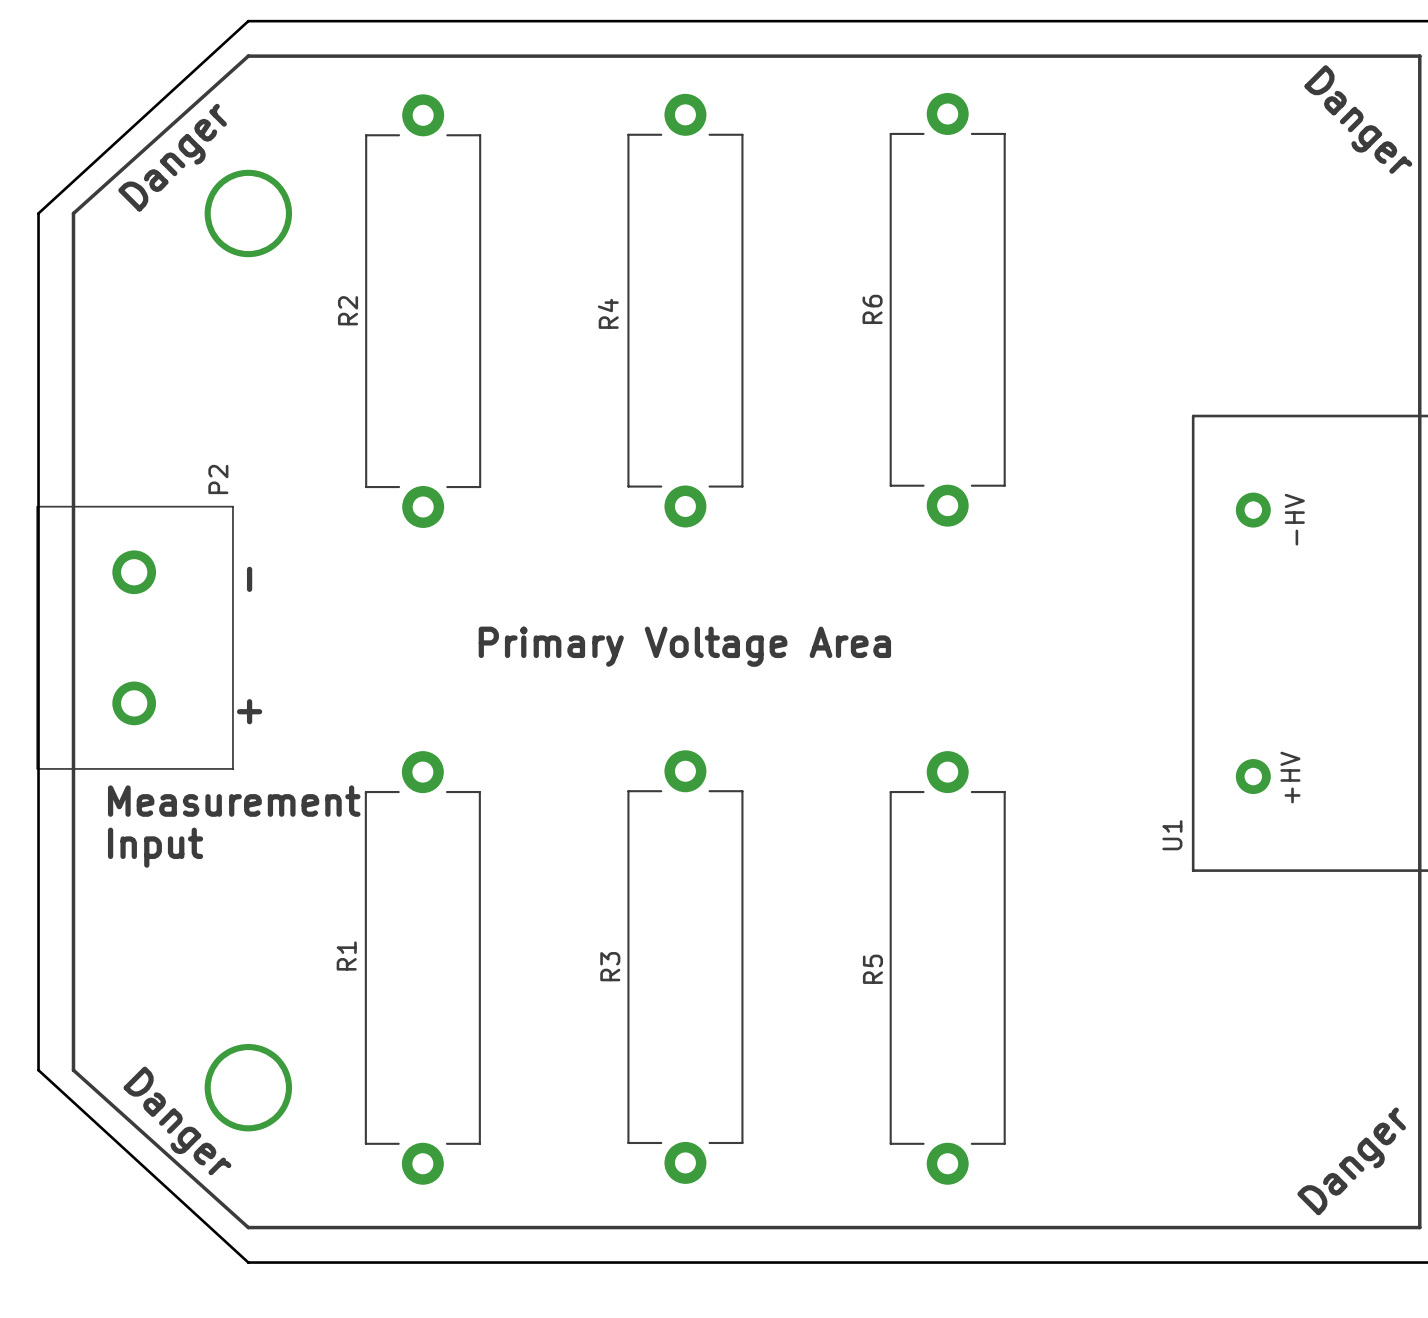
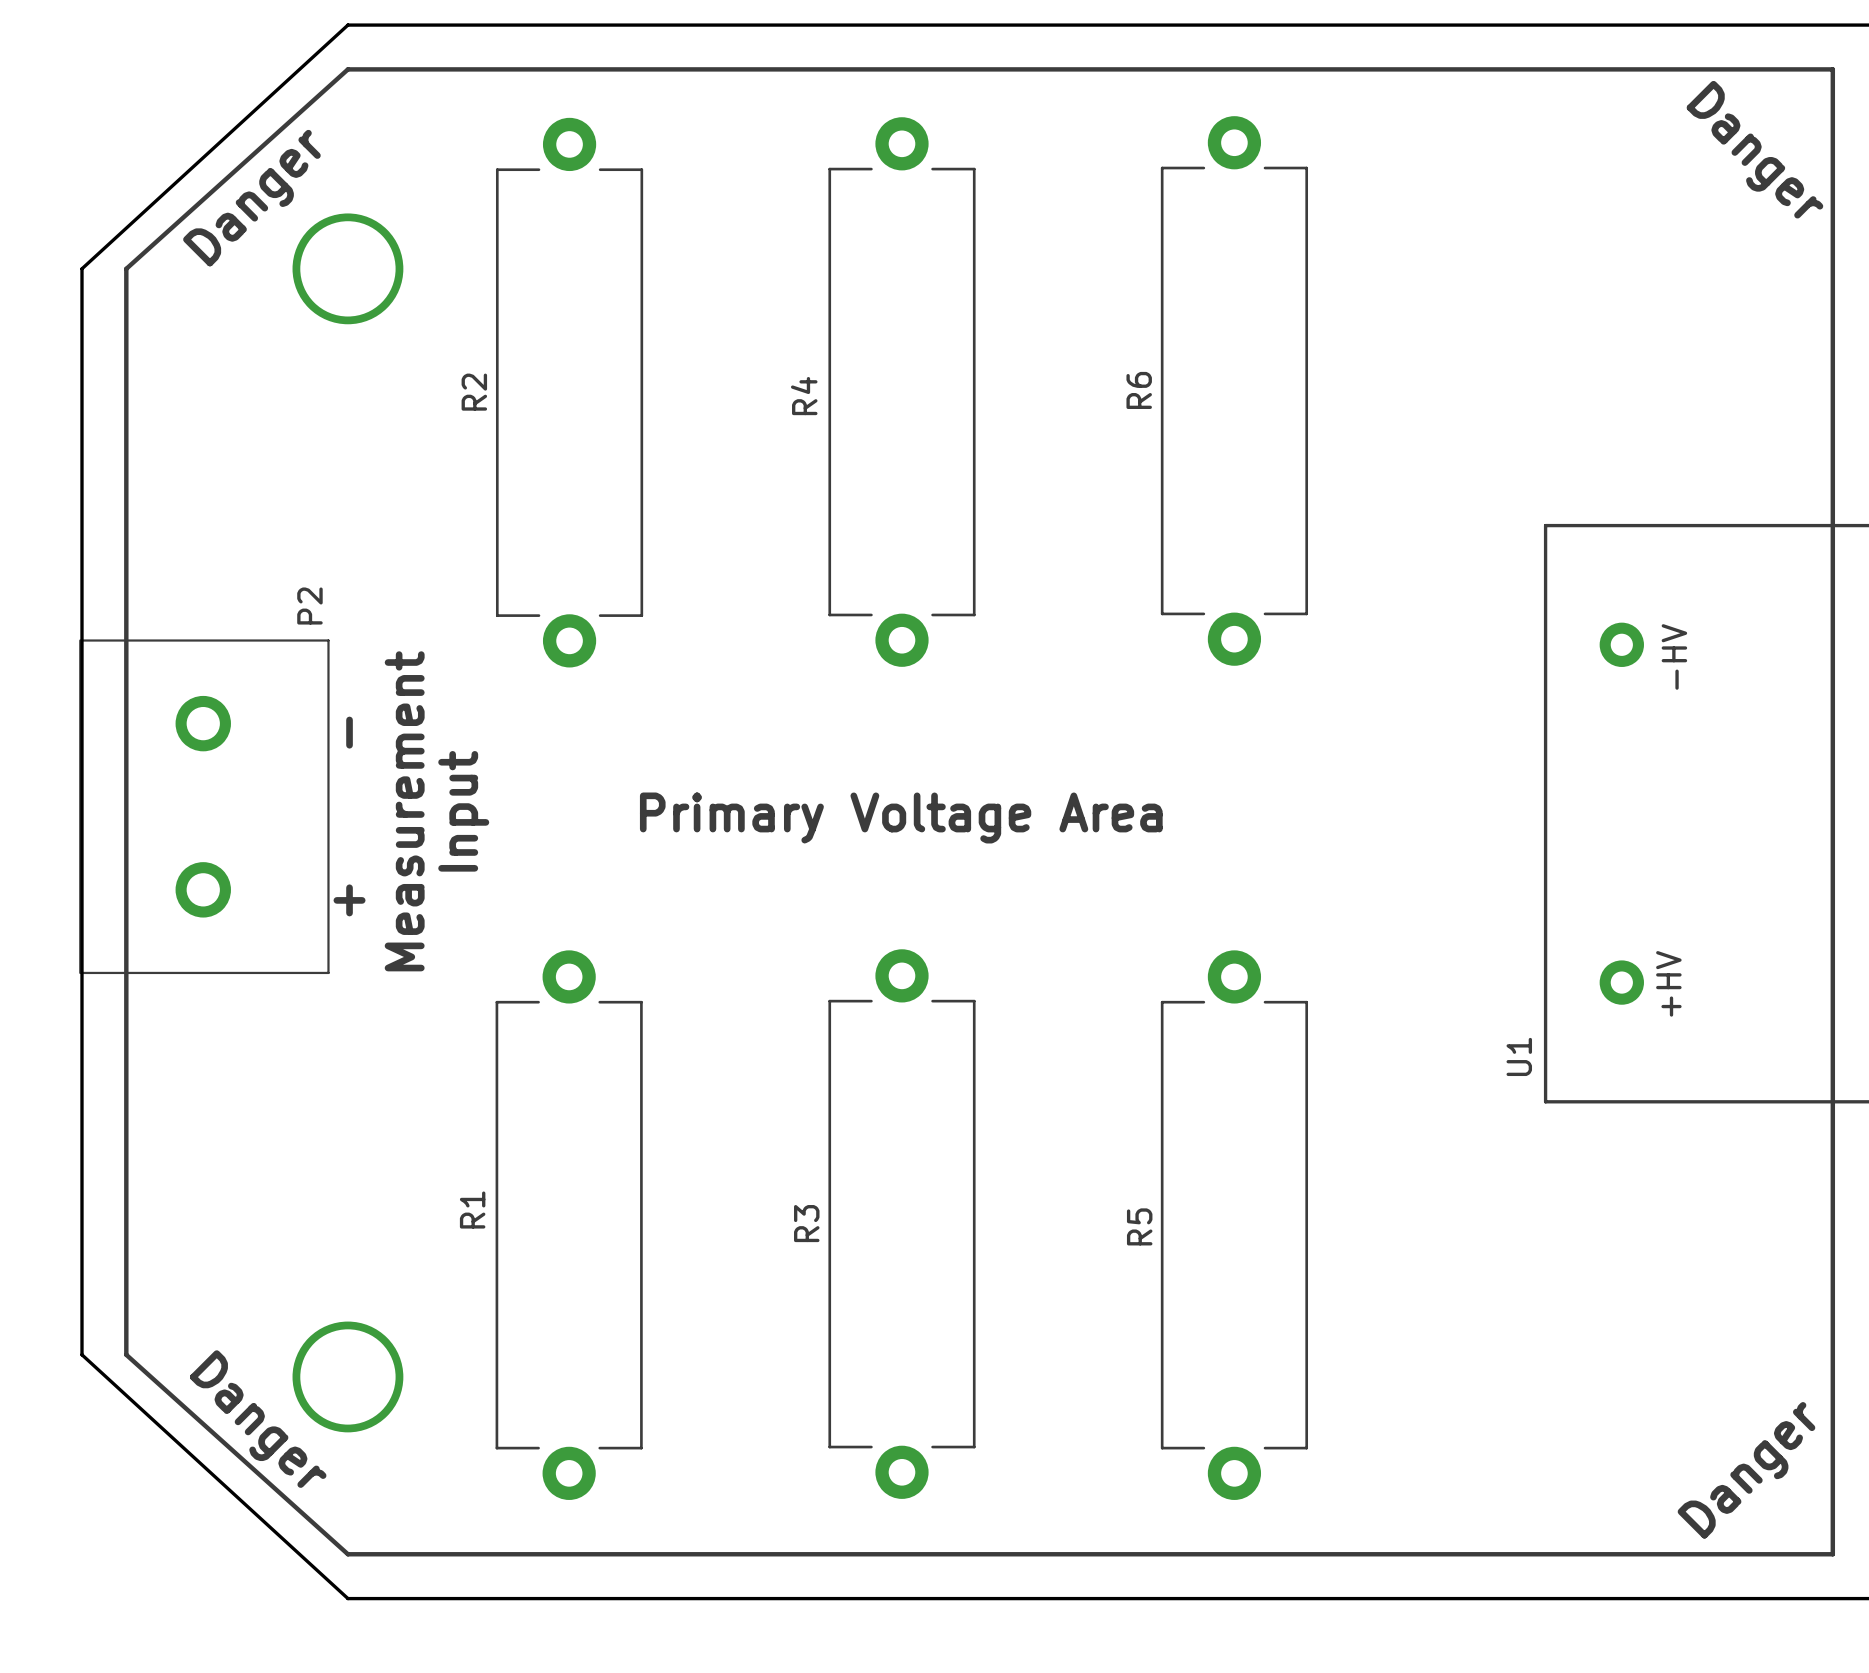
text rotation: 0° (234, 801) -> 90° counterclockwise (404, 811)
text rotation: 0° (155, 847) -> 90° counterclockwise (463, 811)
text position: Input (155, 847) -> Input (463, 811)

